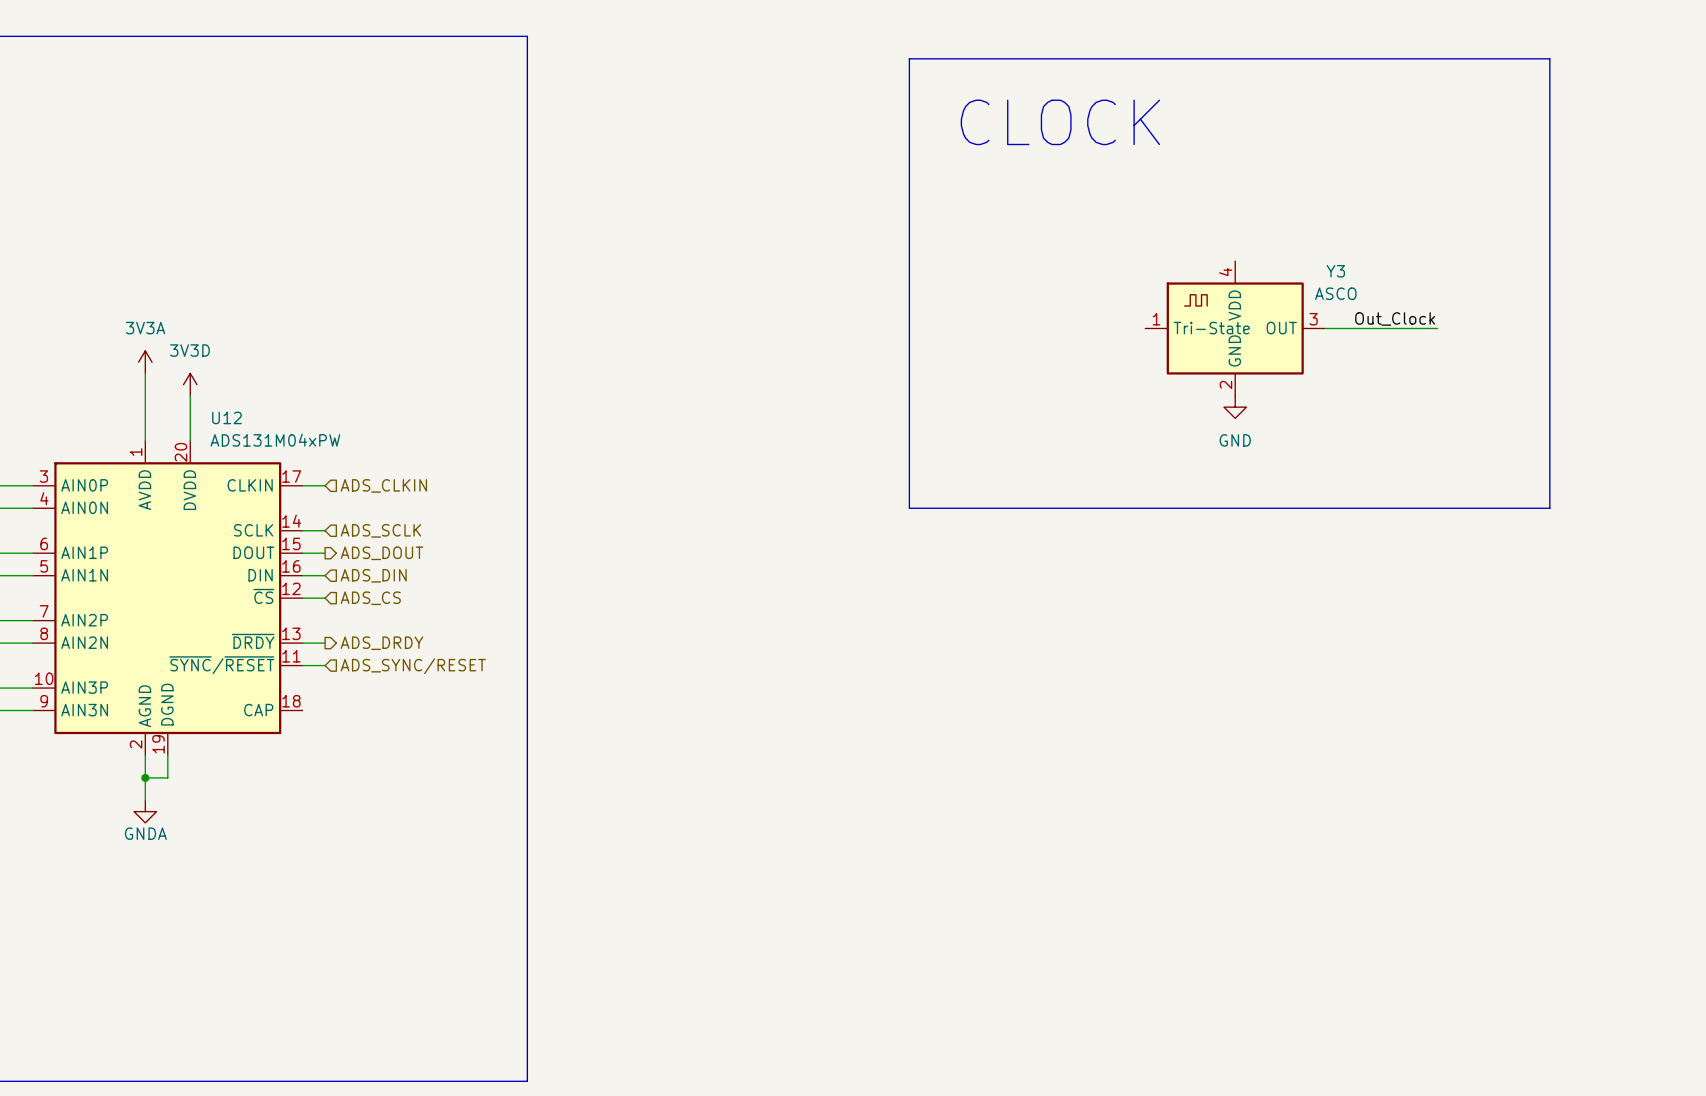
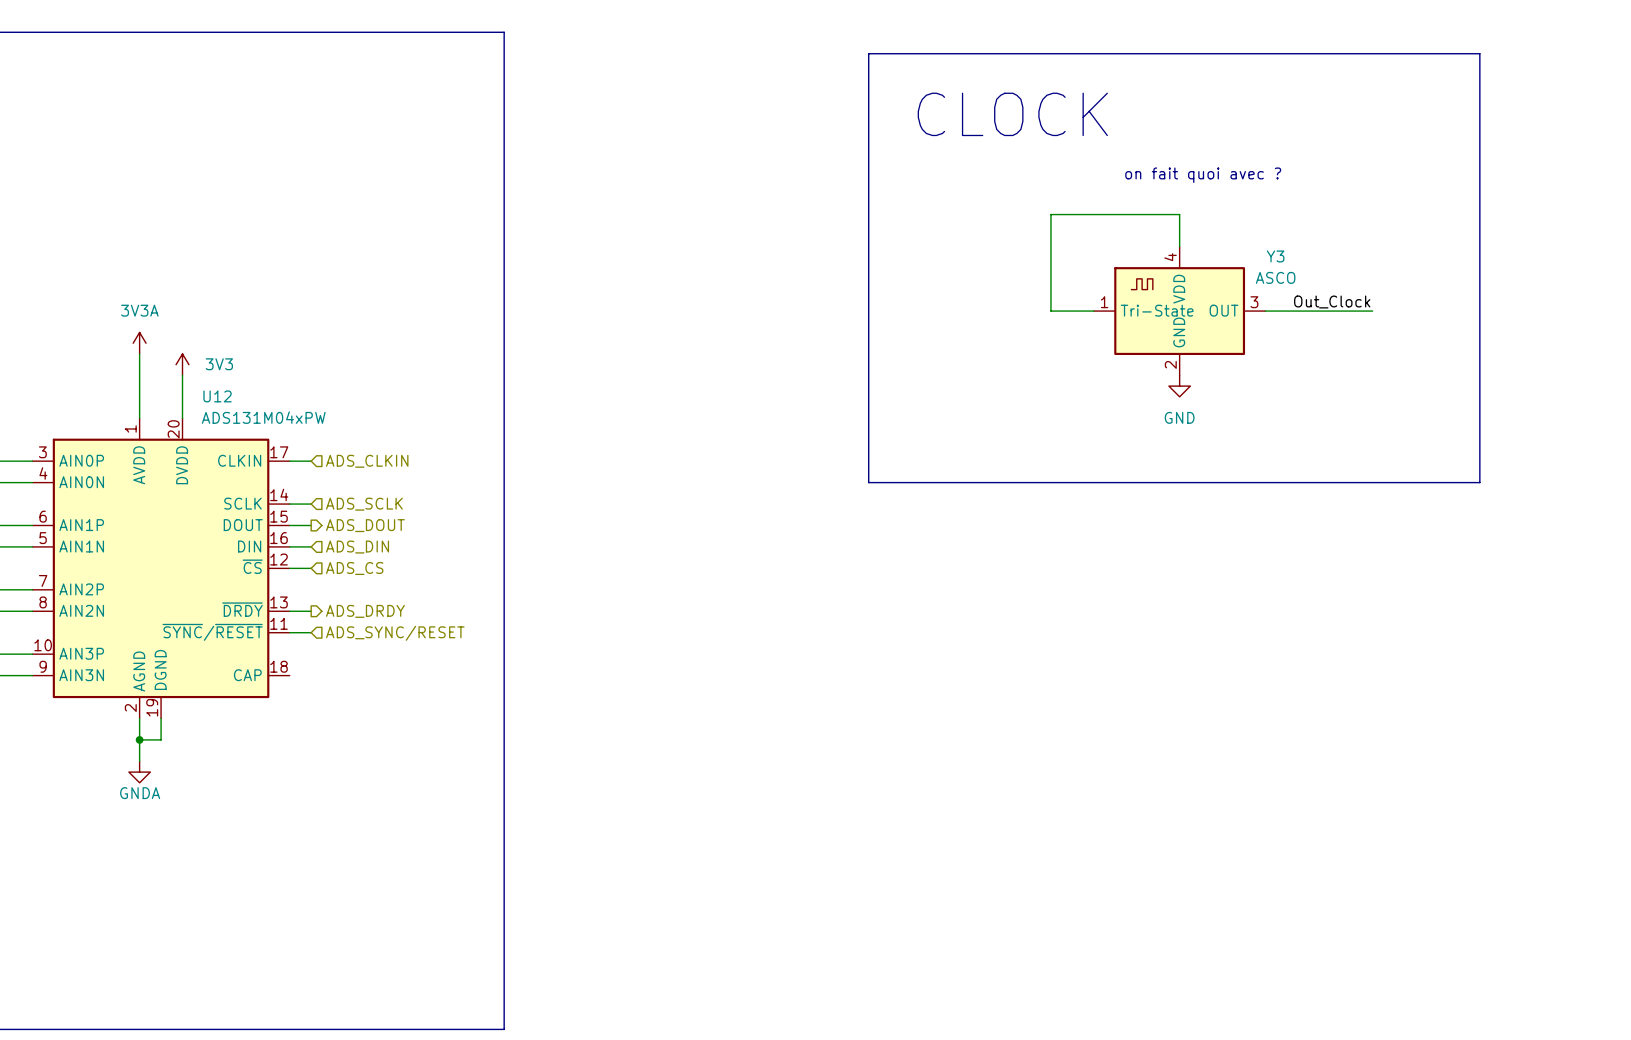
text: none -> on fait quoi avec ? (1203, 175)
wire: none -> (1179, 246) (1179, 214) (1050, 214) (1050, 311) (1093, 311)
power symbol: 3V3D (190, 384) -> 3V3 (182, 364)

